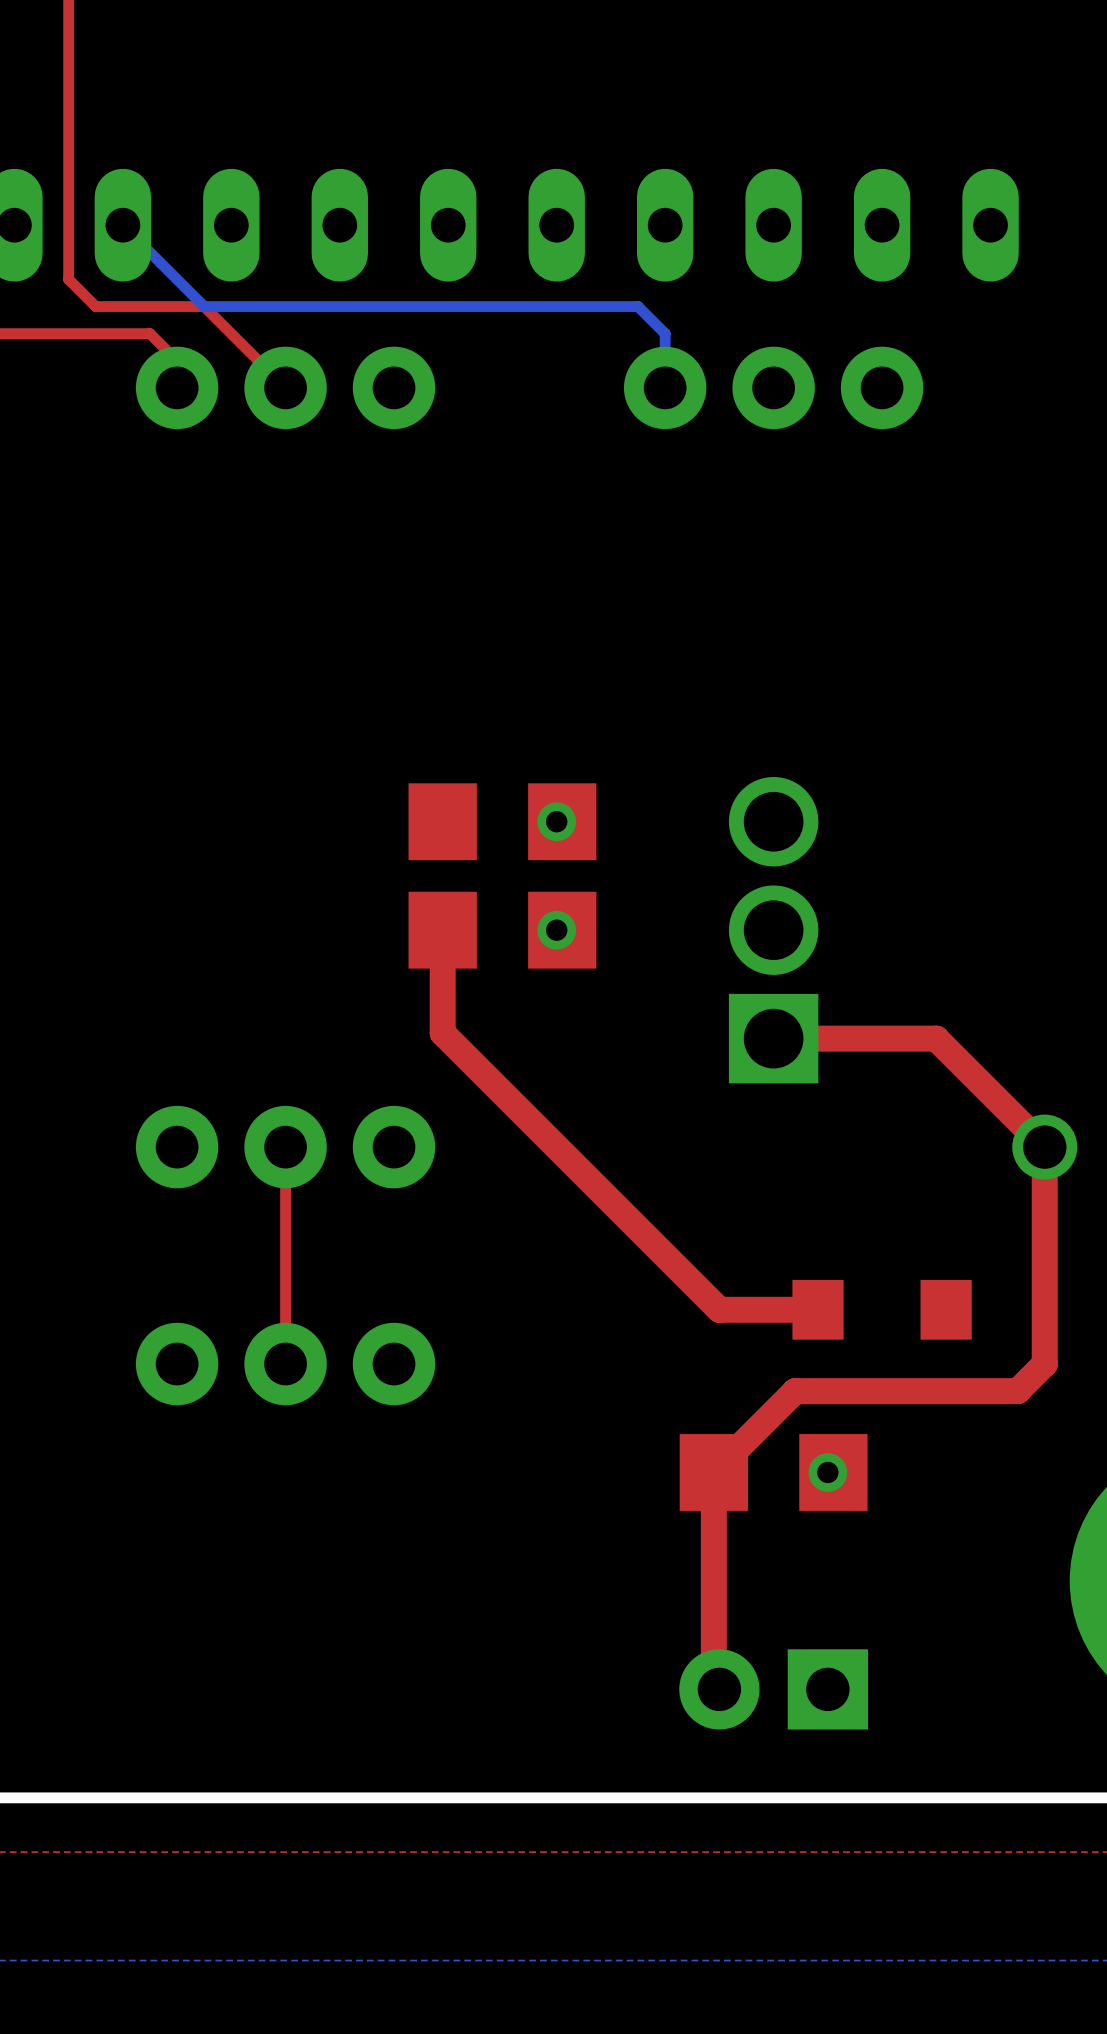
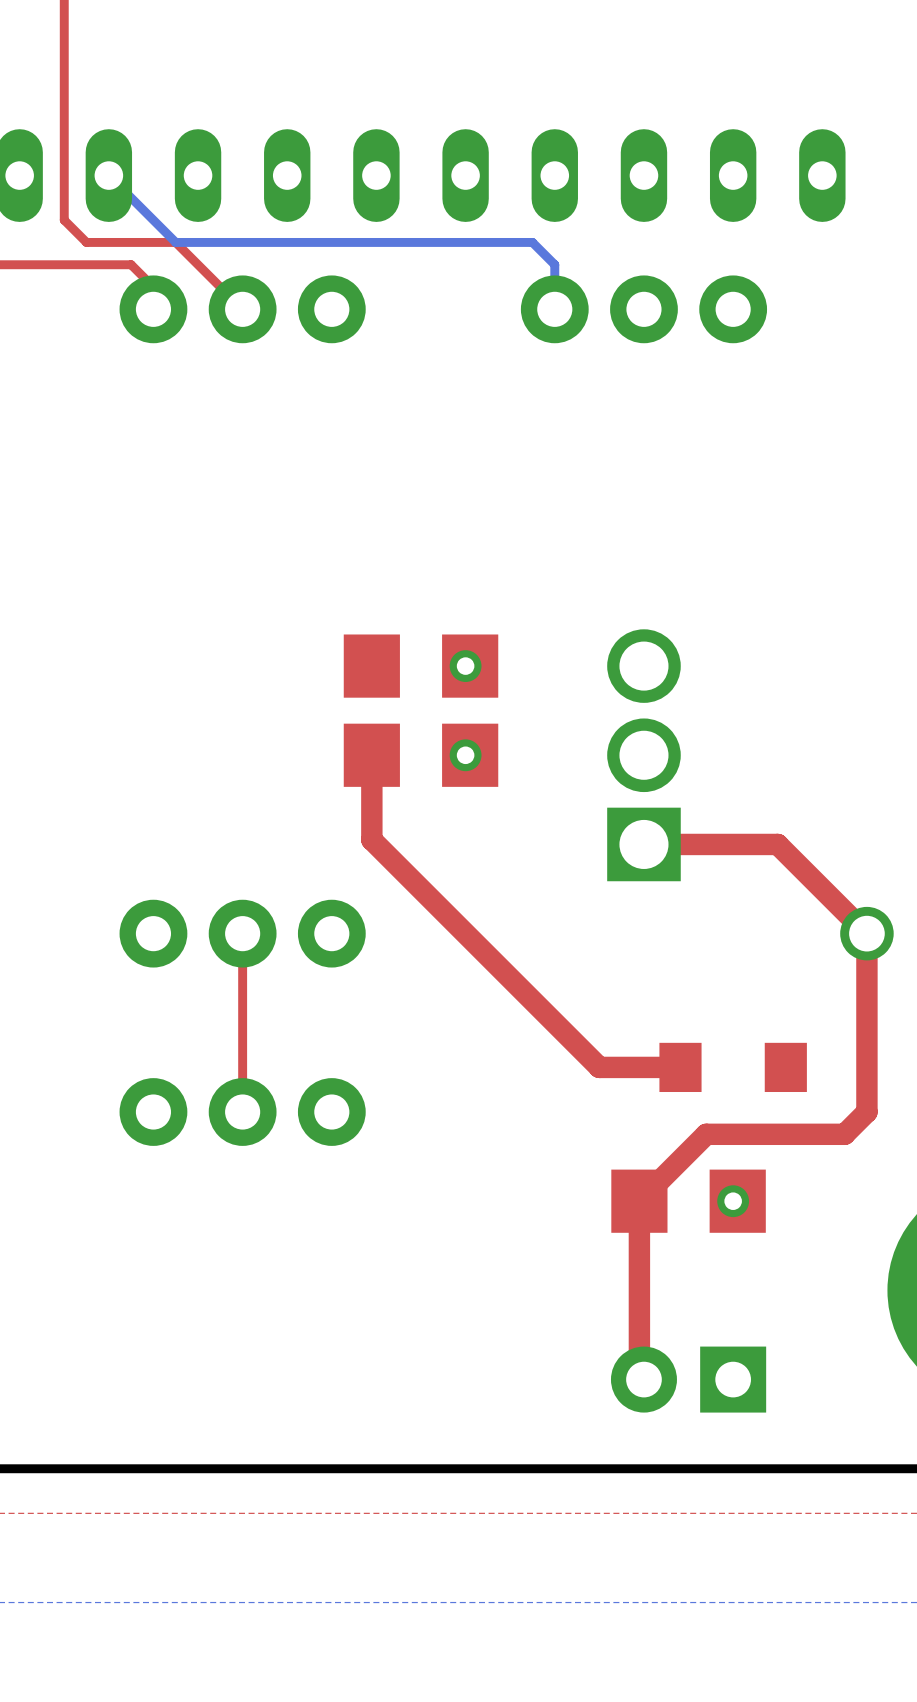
top track: (849, 1391) (795, 1391) (713, 1472) (713, 1683) (719, 1689) -> (706, 1134) (639, 1201) (639, 1375) (643, 1379)
part position: (773, 1472) -> (688, 1201)
via position: (827, 1472) -> (733, 1201)
part position: (773, 1689) -> (688, 1379)

